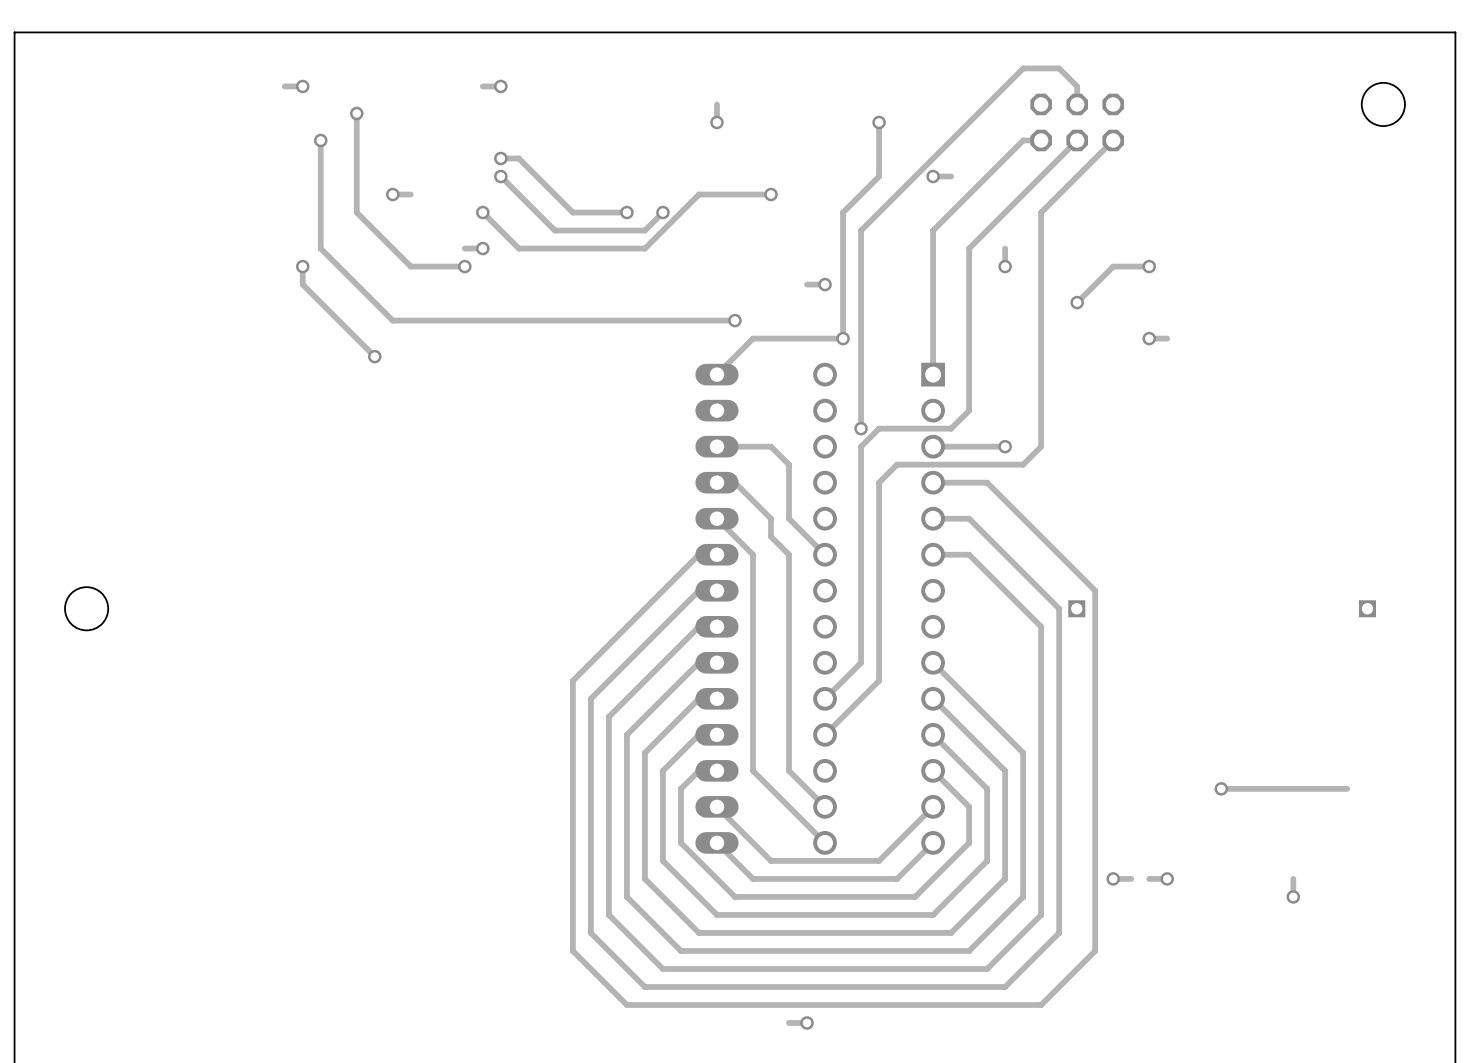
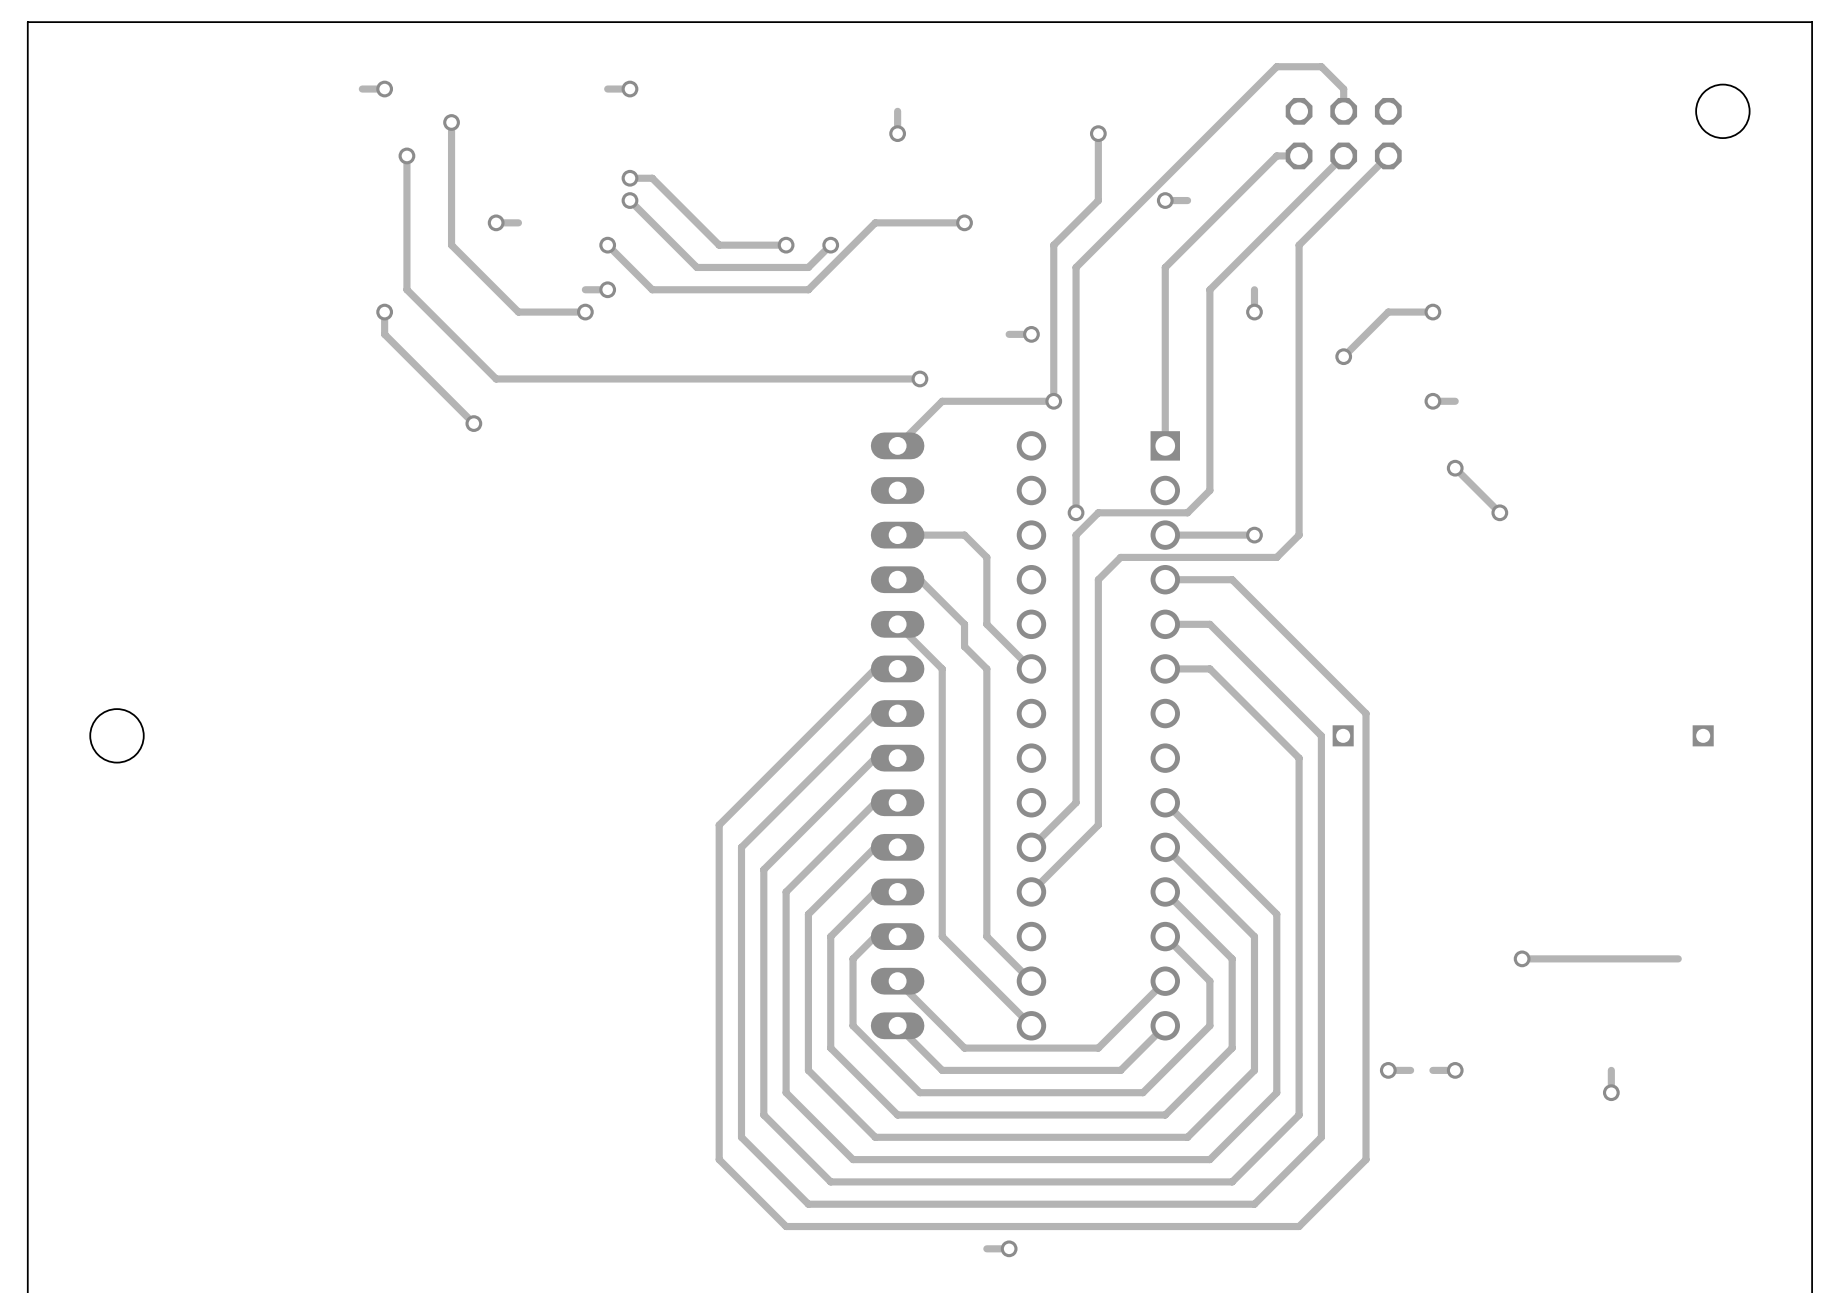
track: none -> (1455, 468) (1499, 512)
via: none -> (1455, 468)
via: none -> (1499, 512)

